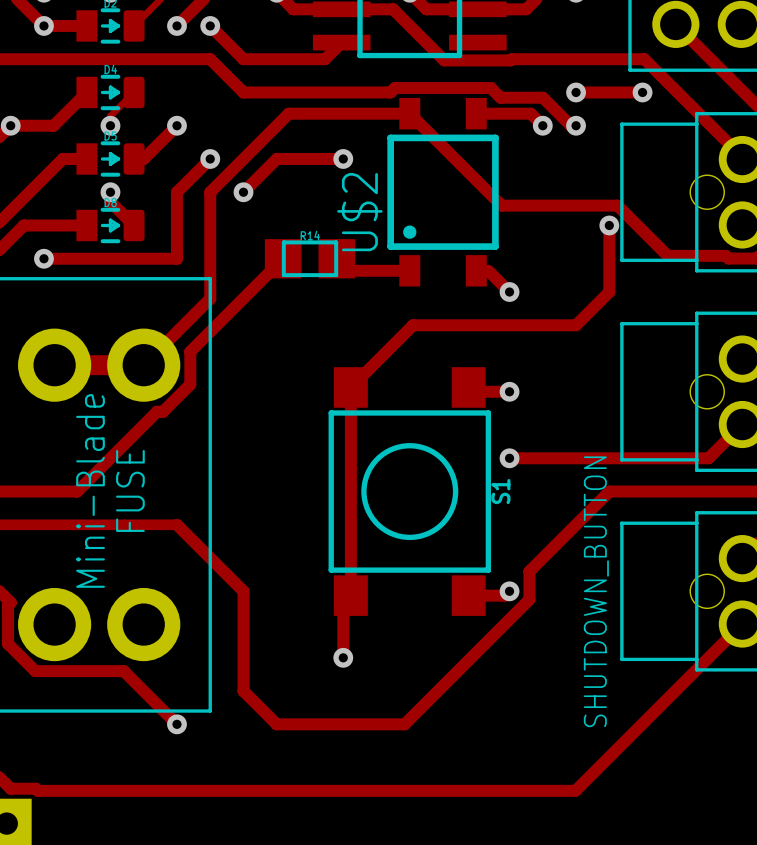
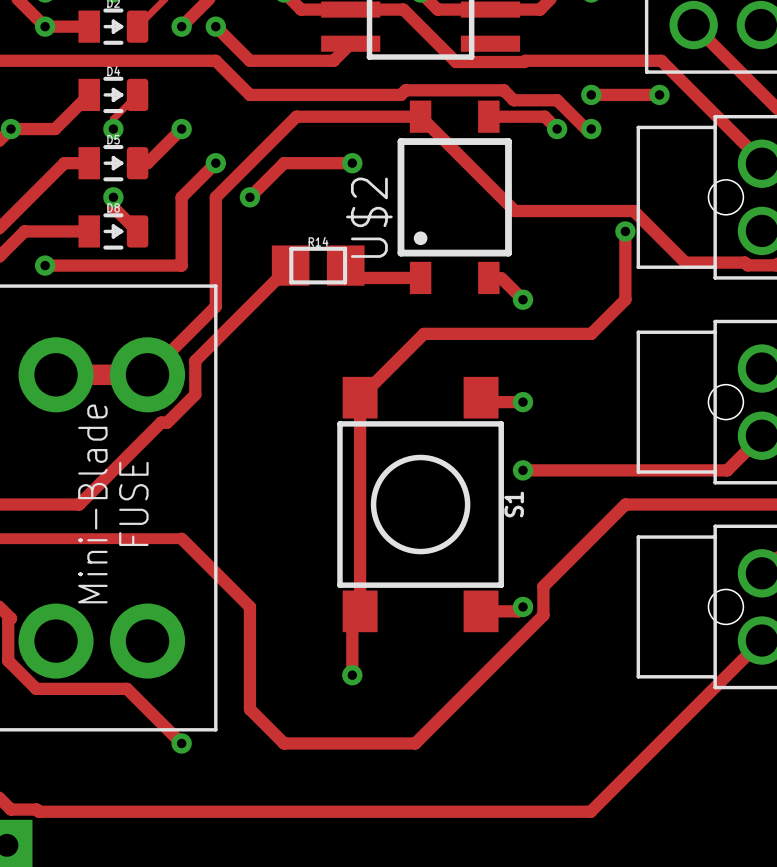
SHUTDOWN_BUTTON name: SHUTDOWN_BUTTON (596, 591) -> none

